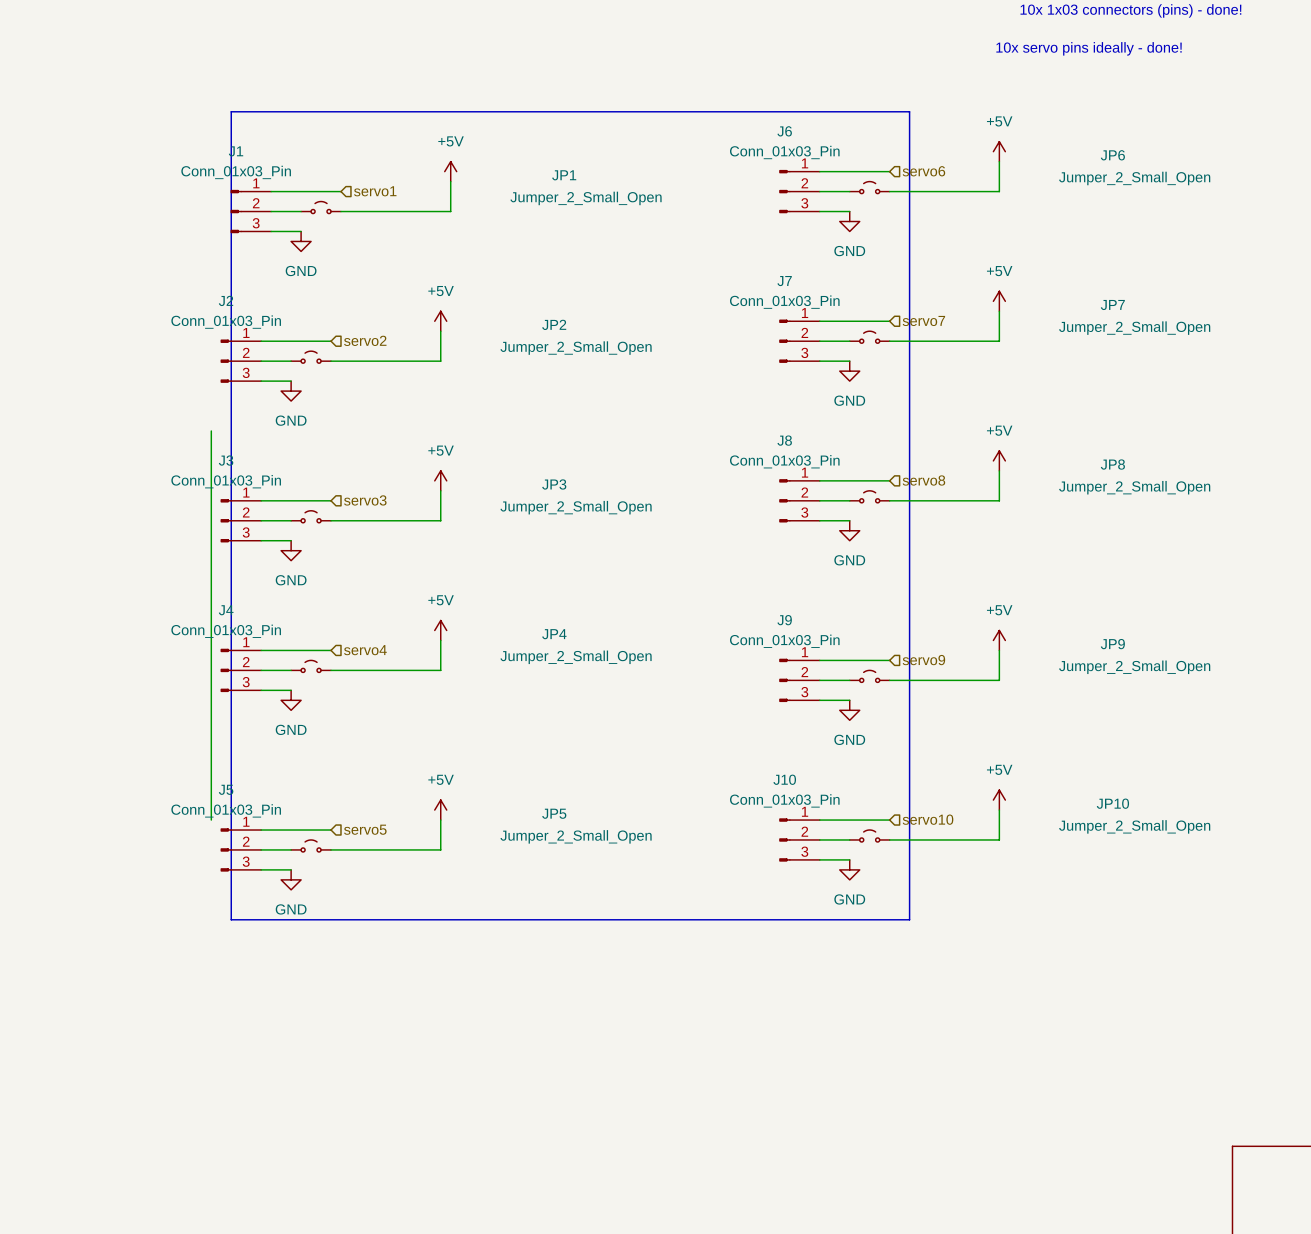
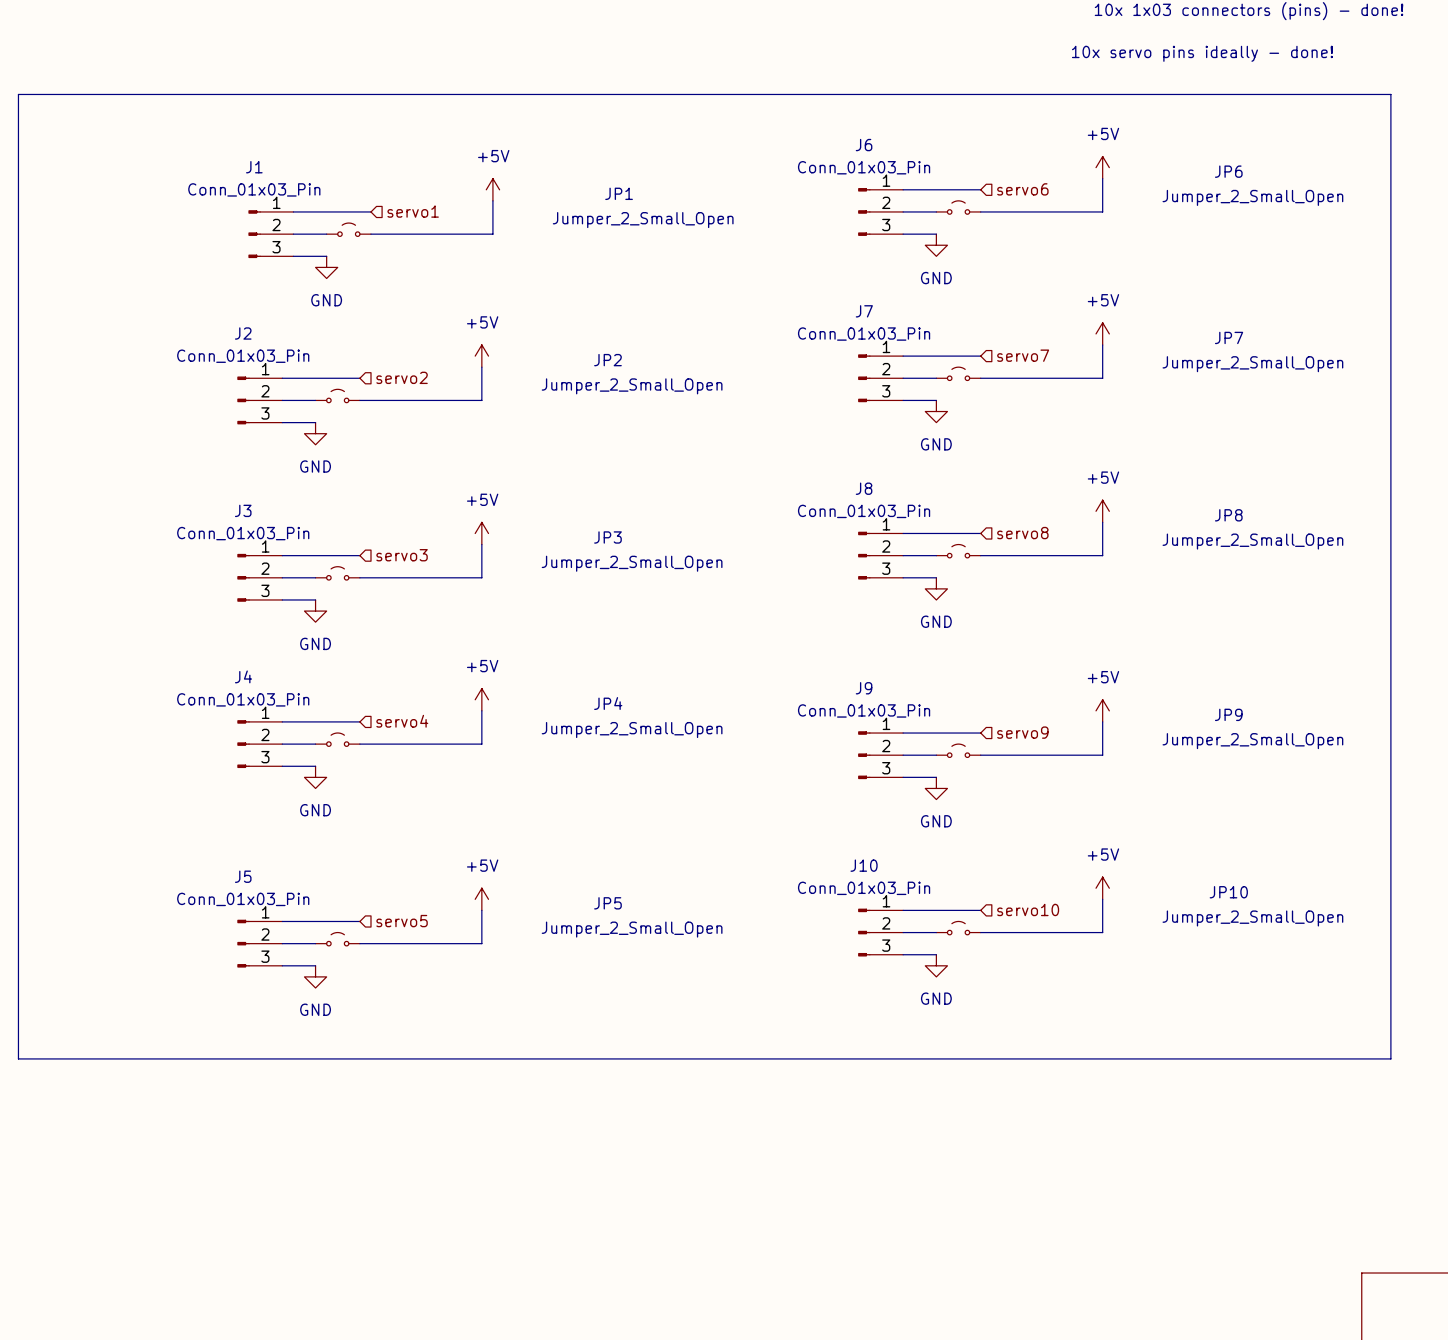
line: (231, 111) (909, 111) (909, 919) (231, 919) (231, 111) -> (18, 94) (18, 1058) (1390, 1058) (1390, 94) (18, 94)
wire: (211, 430) (211, 820) -> none

